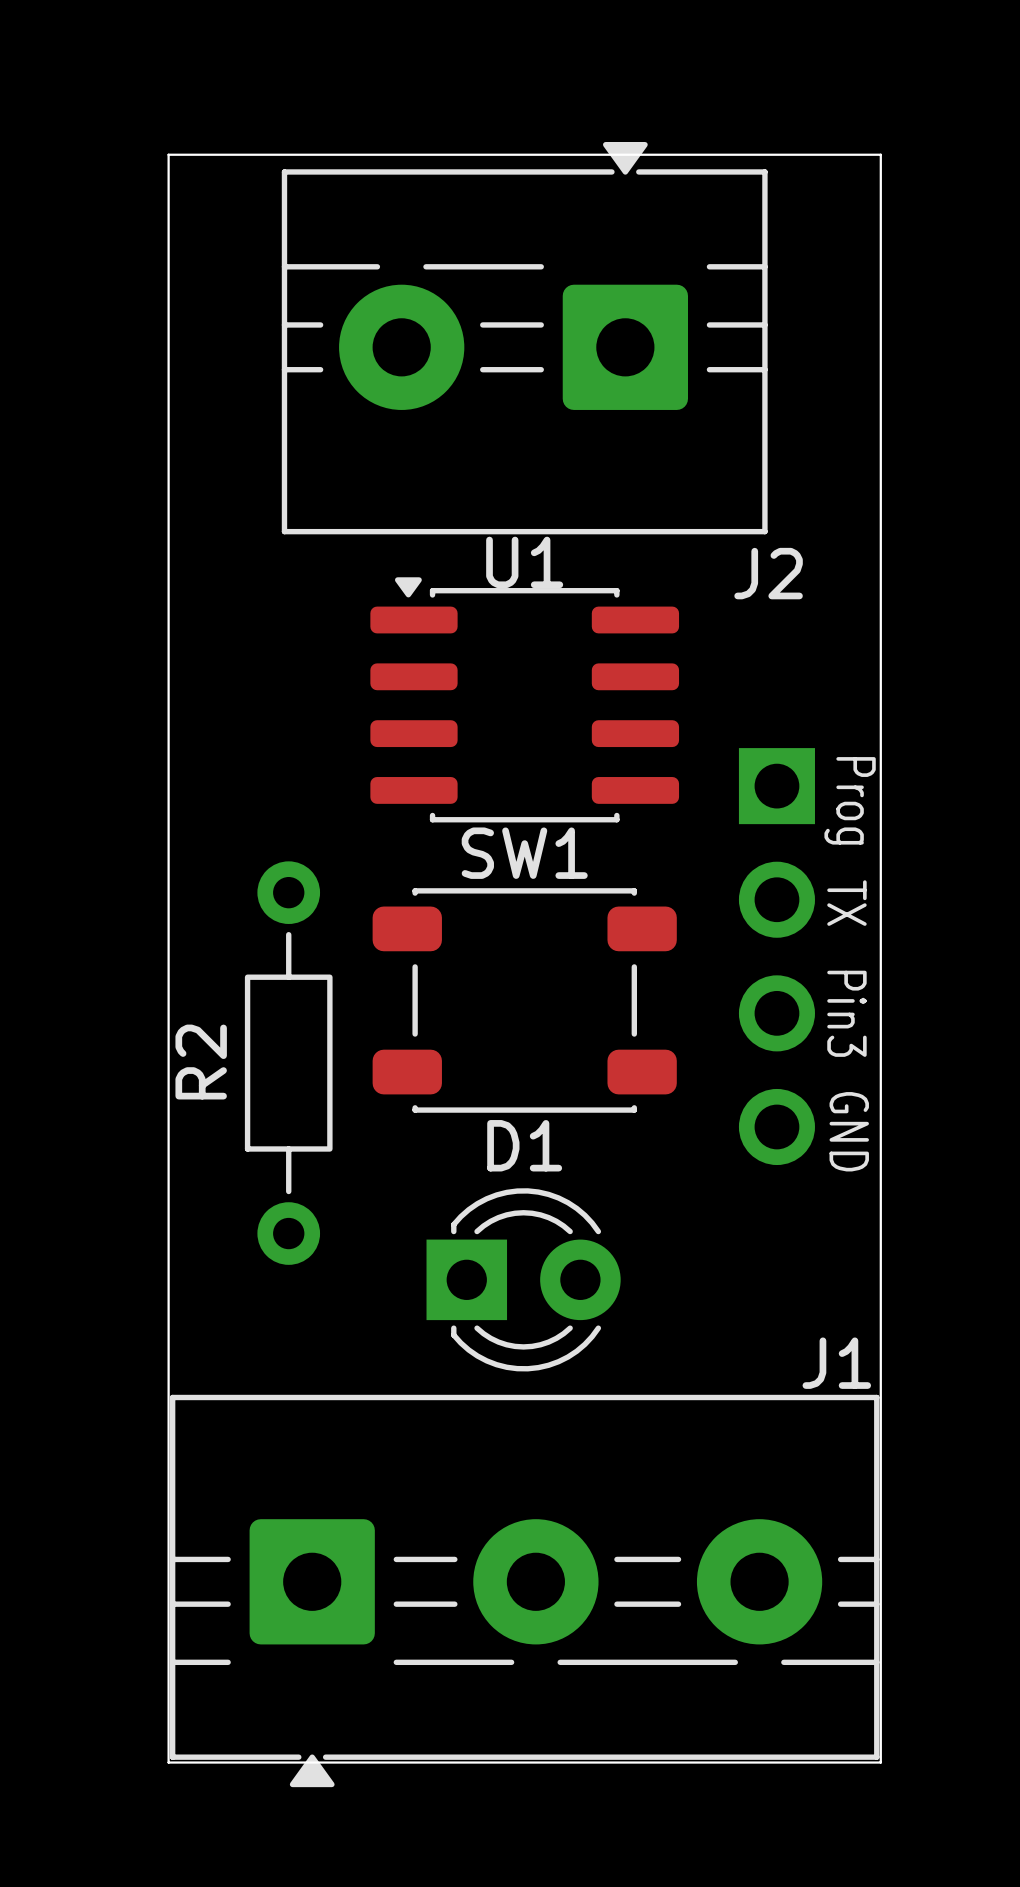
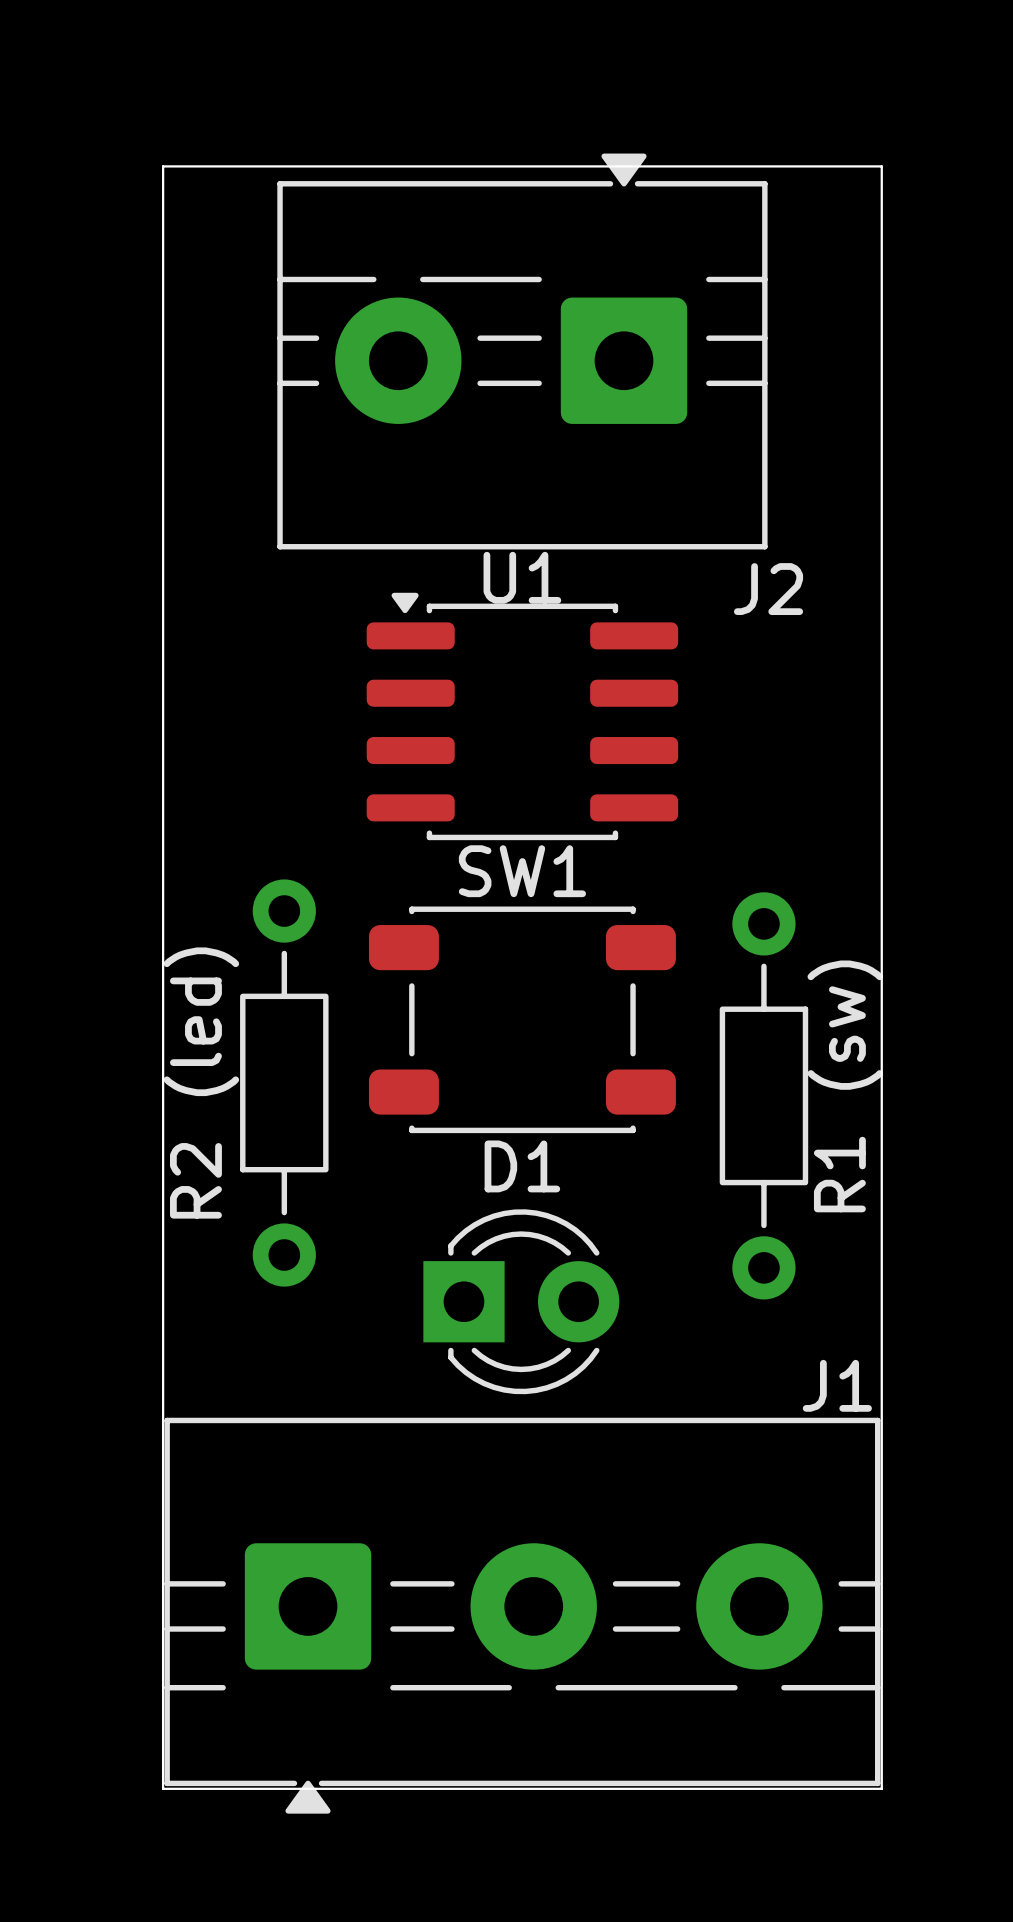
text: Prog (850, 800) -> none
text: TX (846, 903) -> none
part: (776, 956) -> none
text: Pin3 (846, 1013) -> none
R2 name: R2 (201, 1062) -> R2 (led) (201, 1083)
R1 (sw): none -> (763, 1095)
text: GND (849, 1131) -> none

